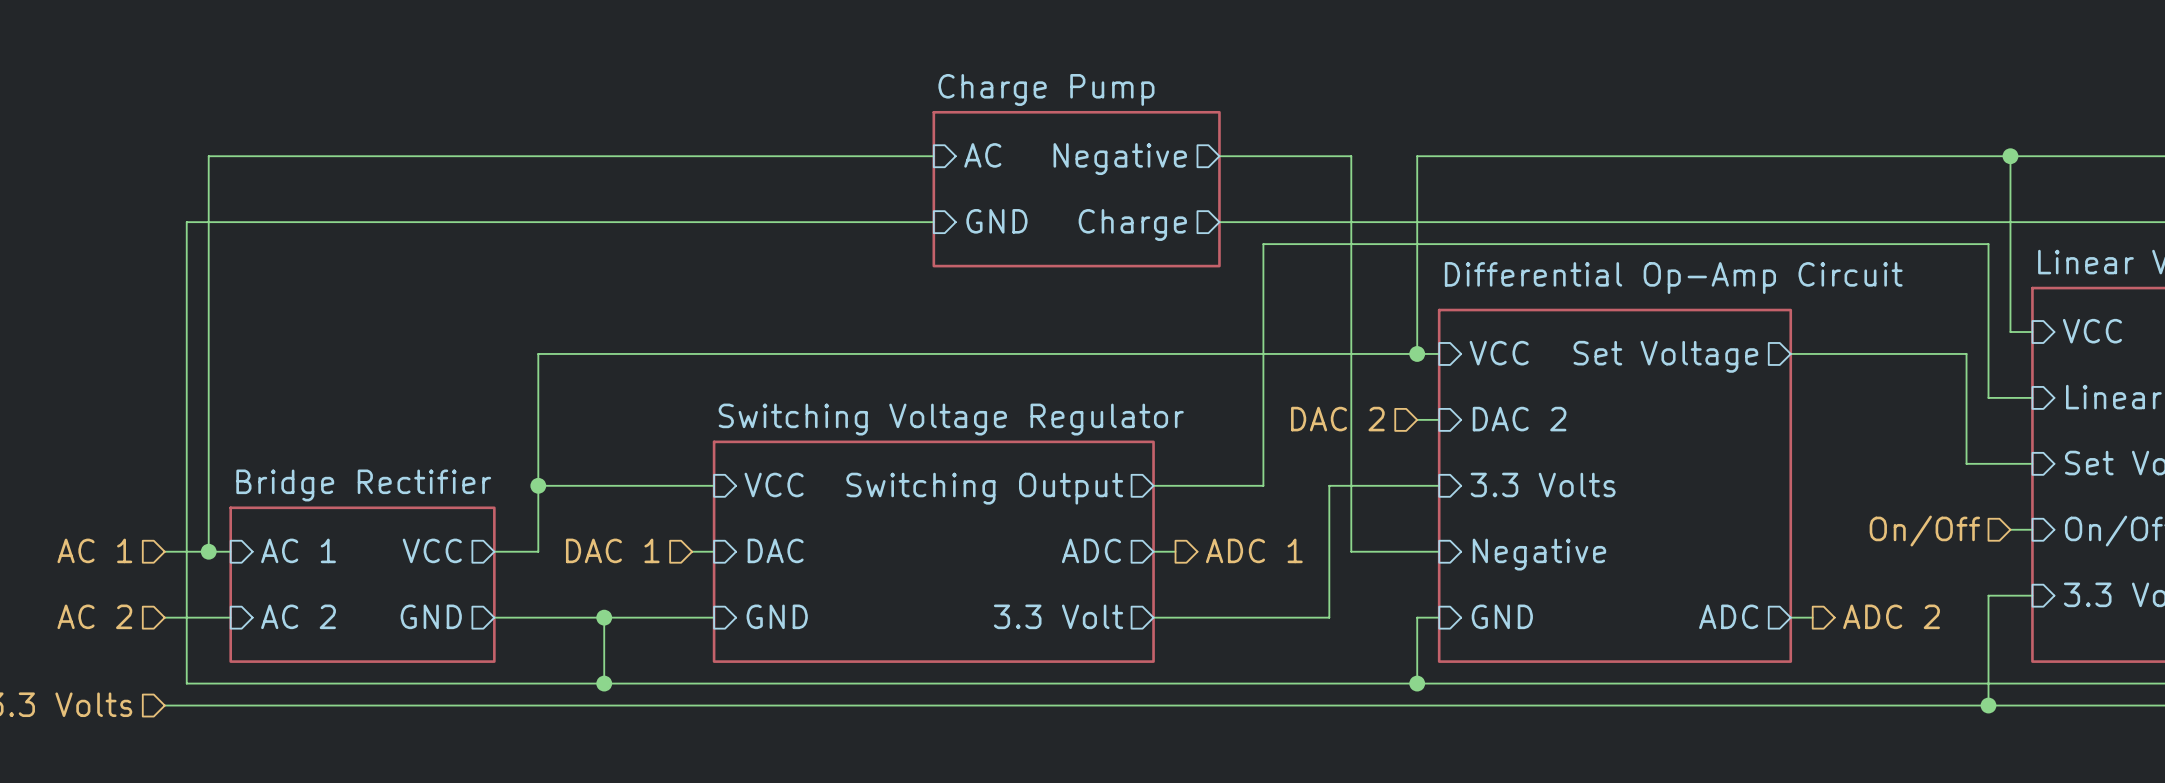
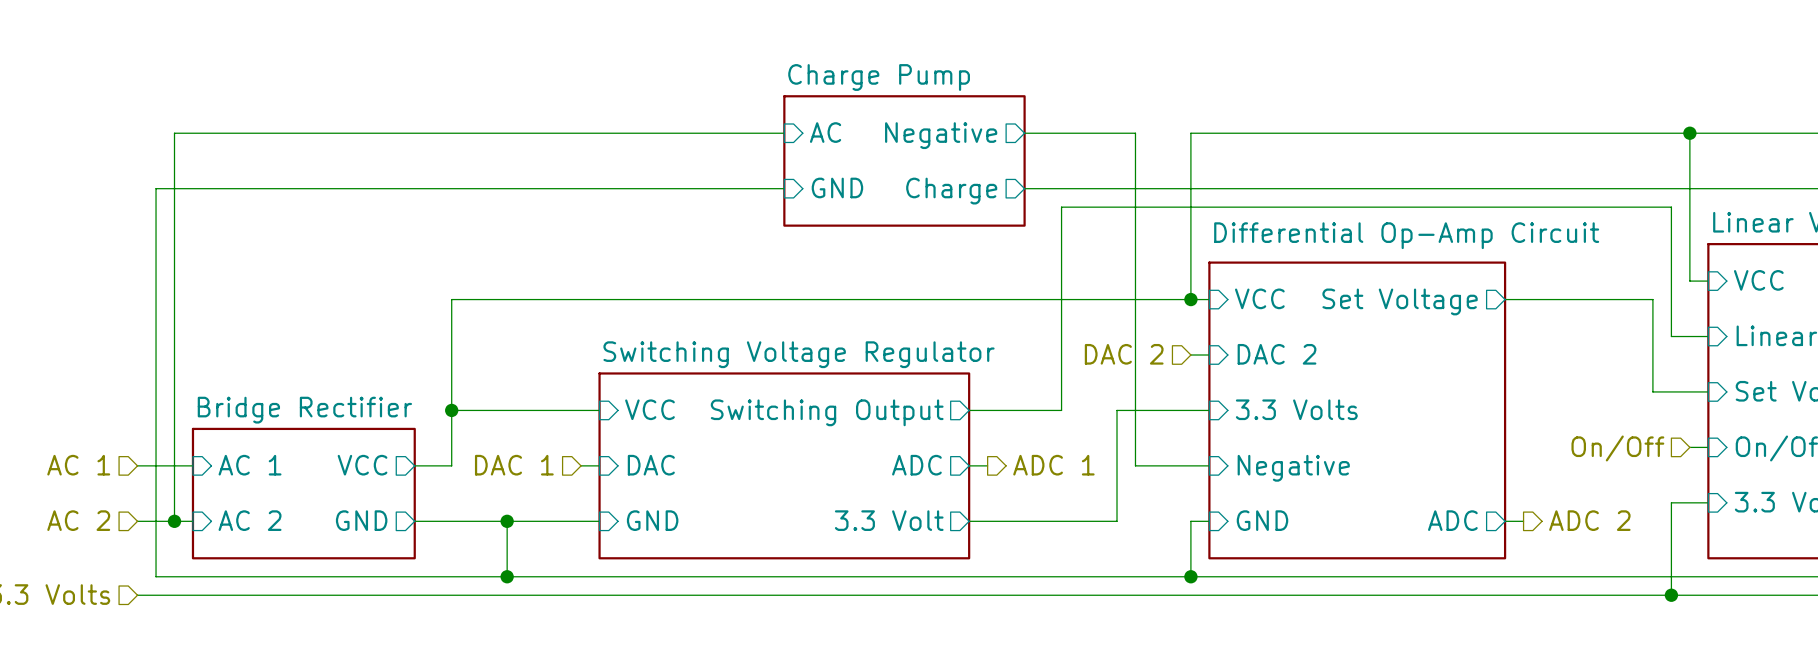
wire: none -> (174, 465) (174, 521)
junction position: (208, 551) -> (174, 521)

